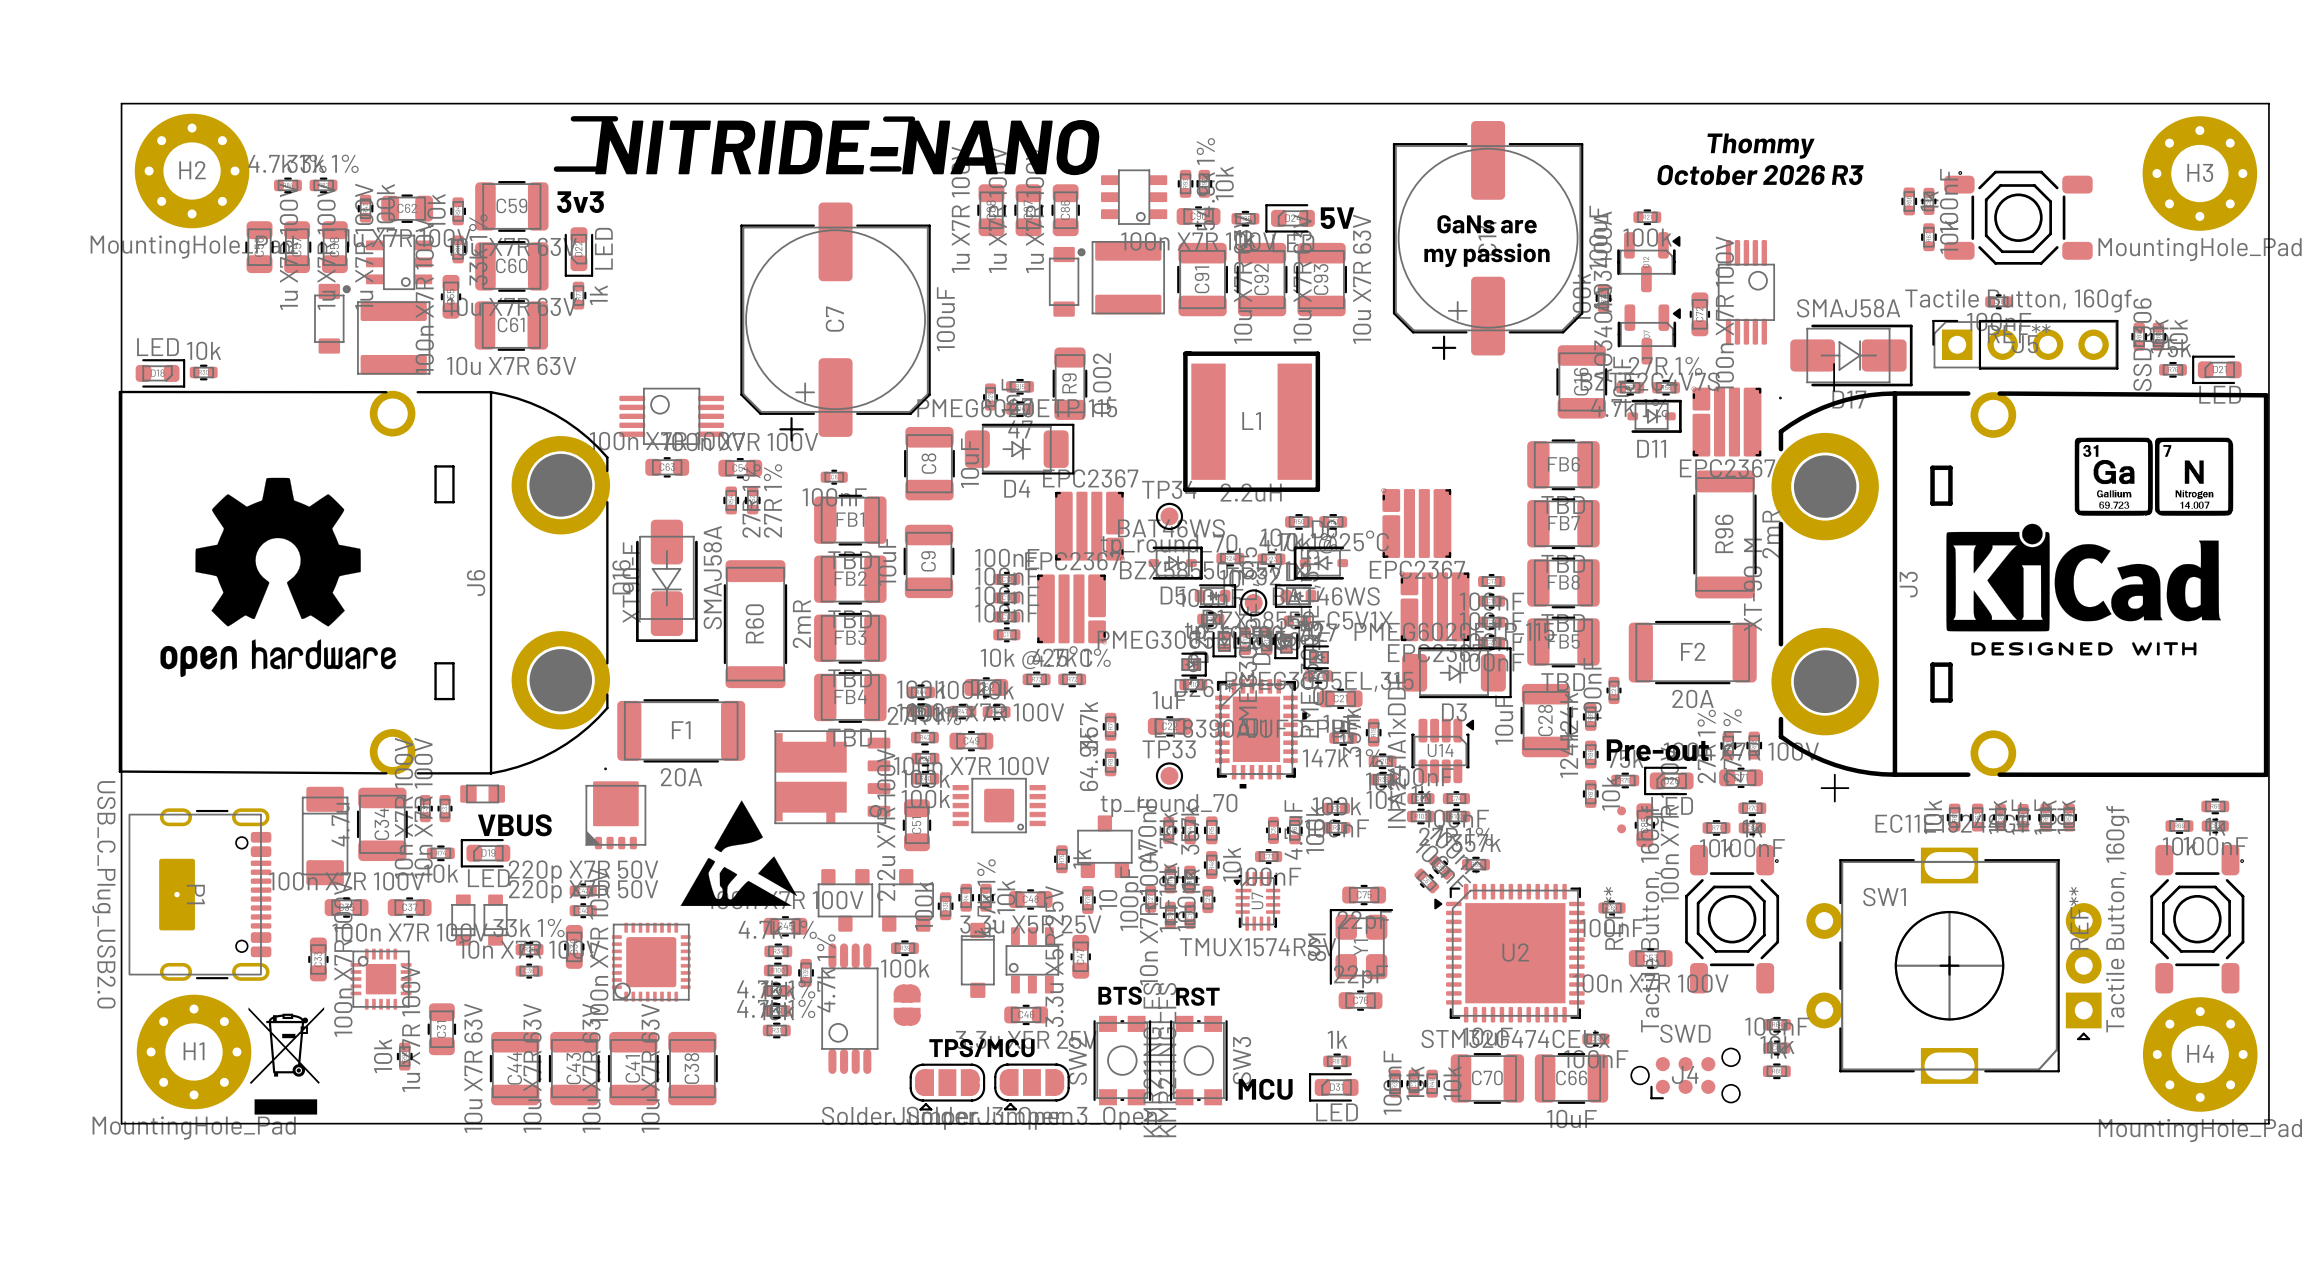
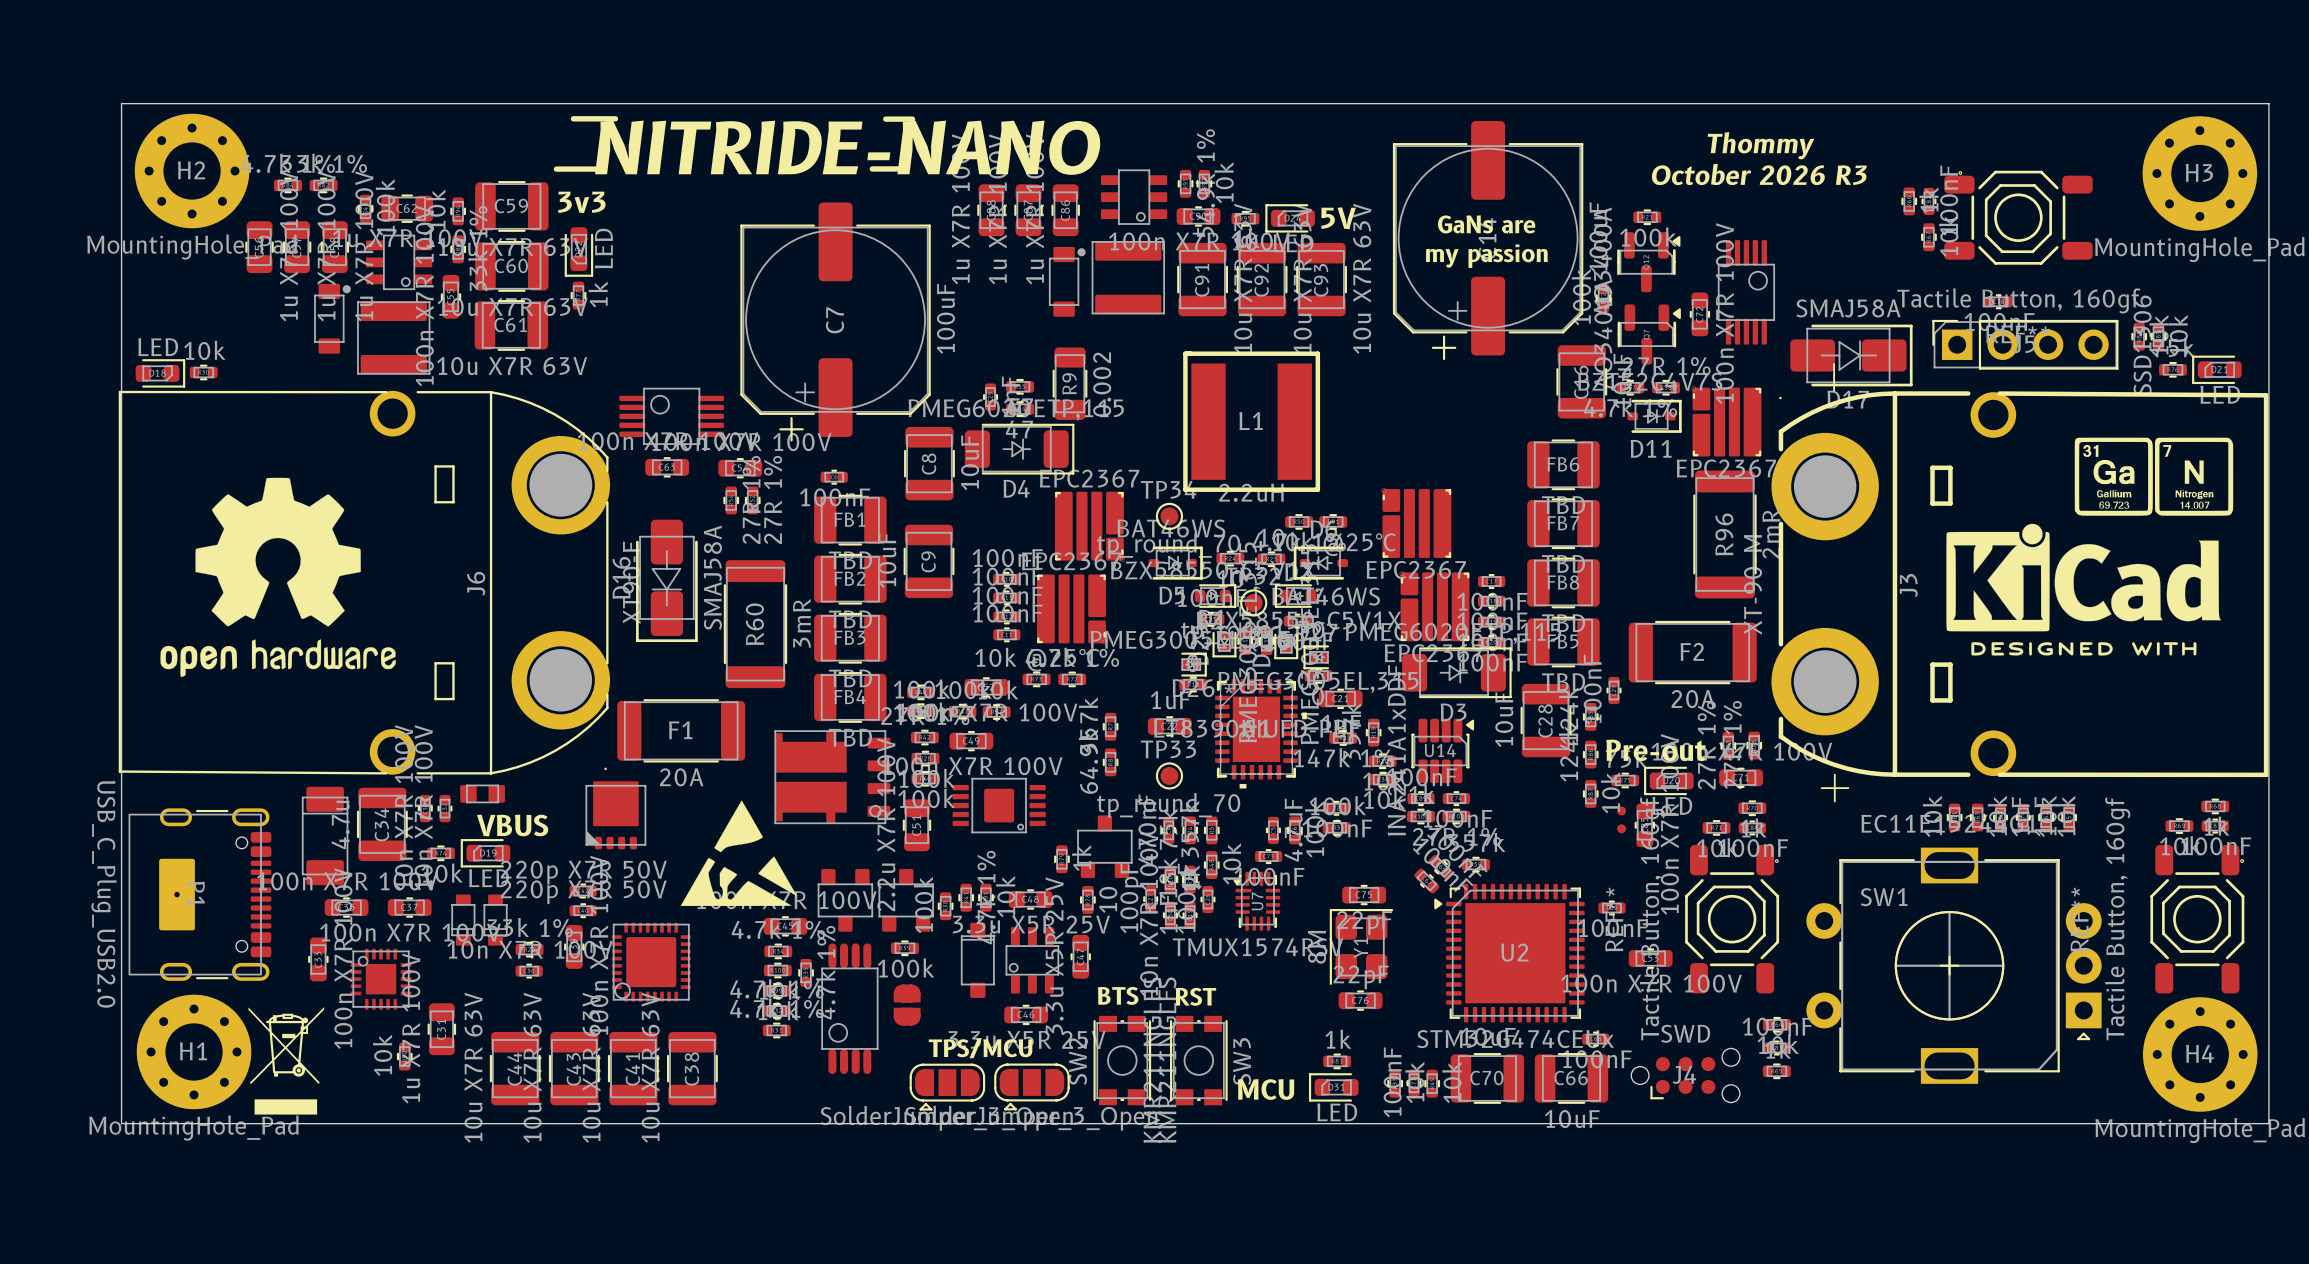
R60 value: 2mR (801, 624) -> 3mR (801, 623)

